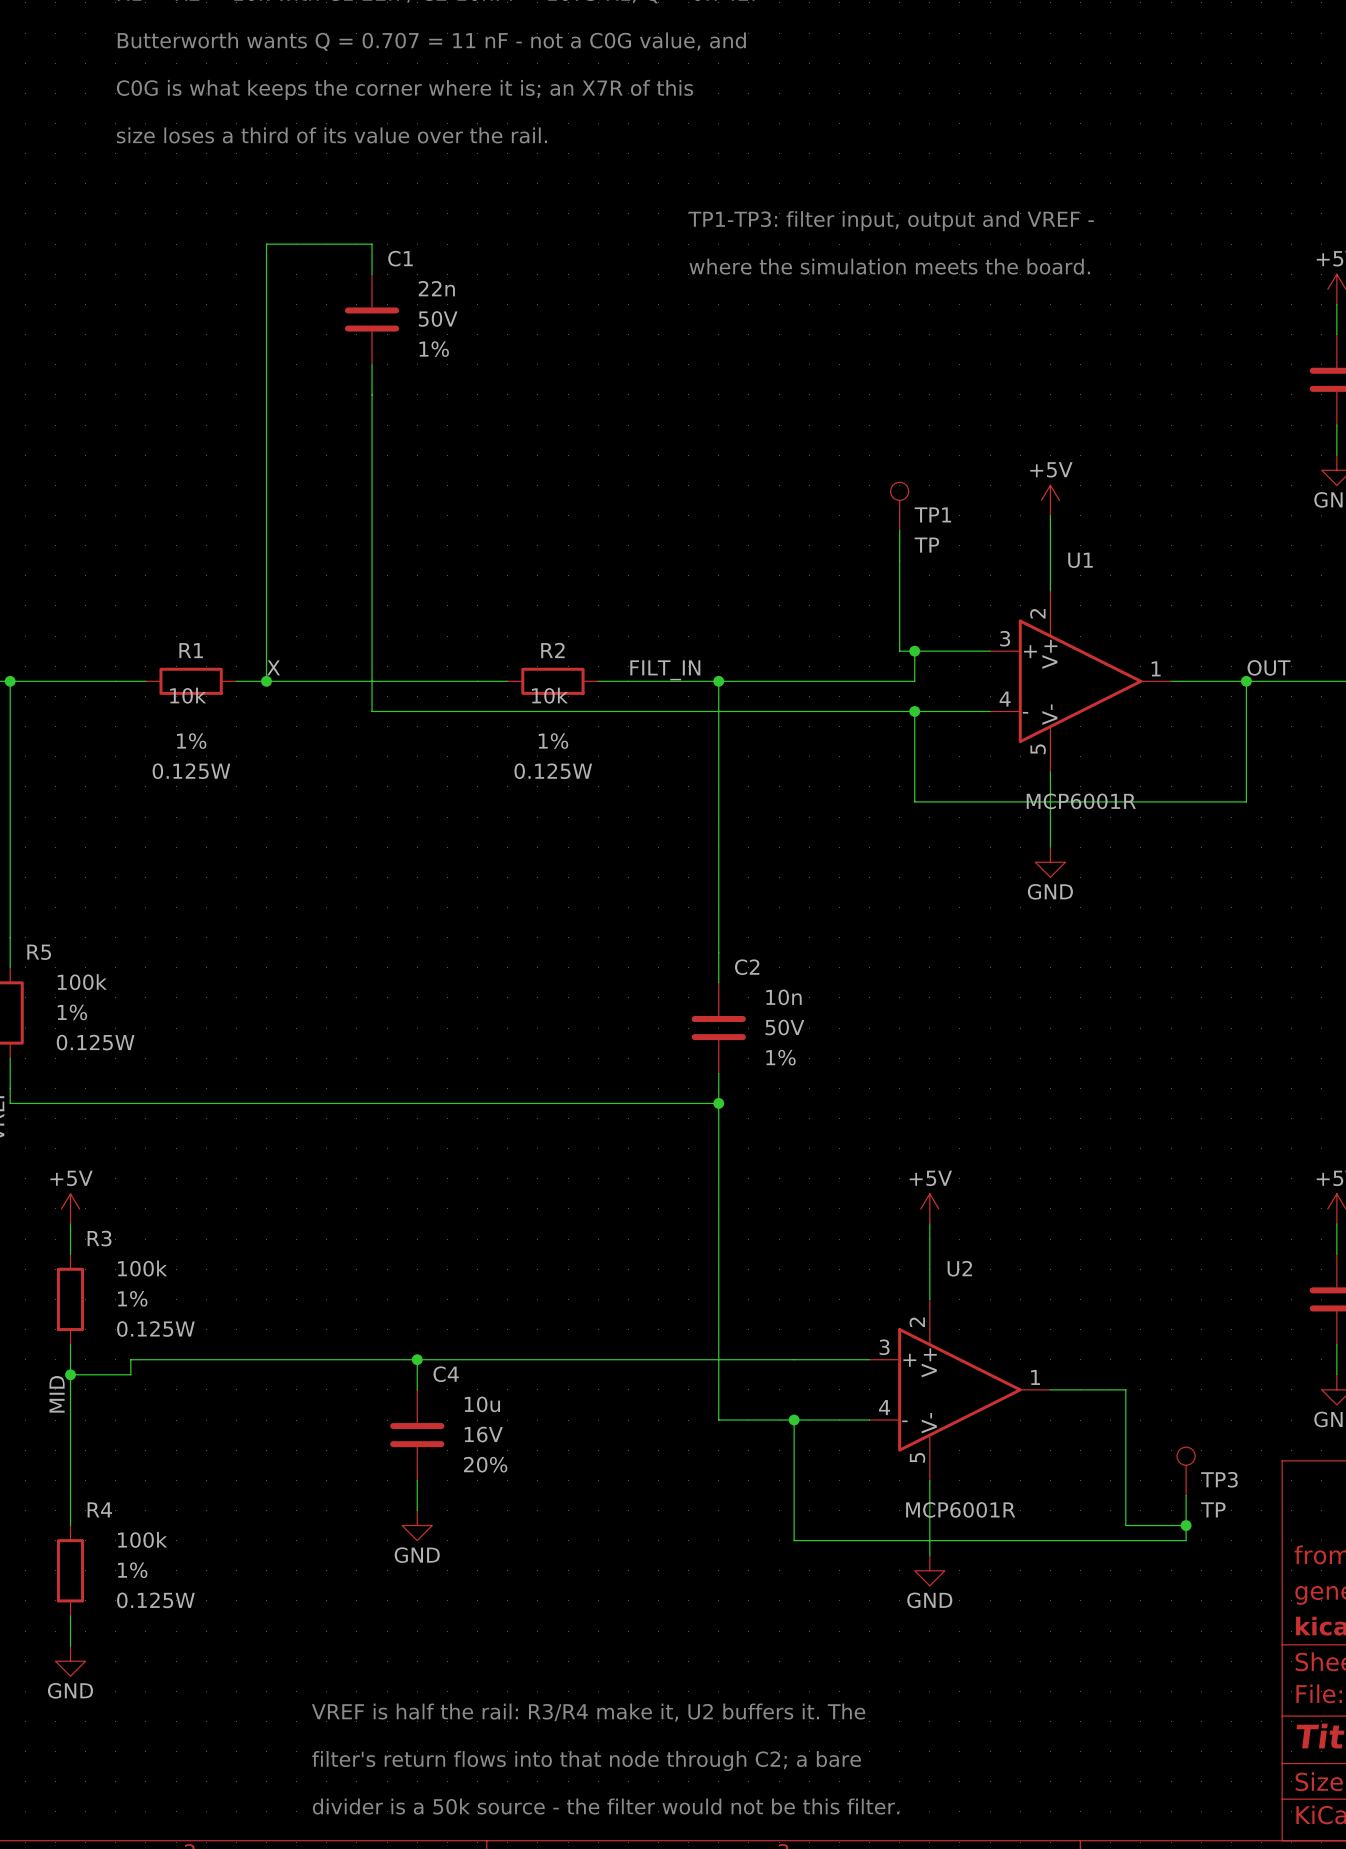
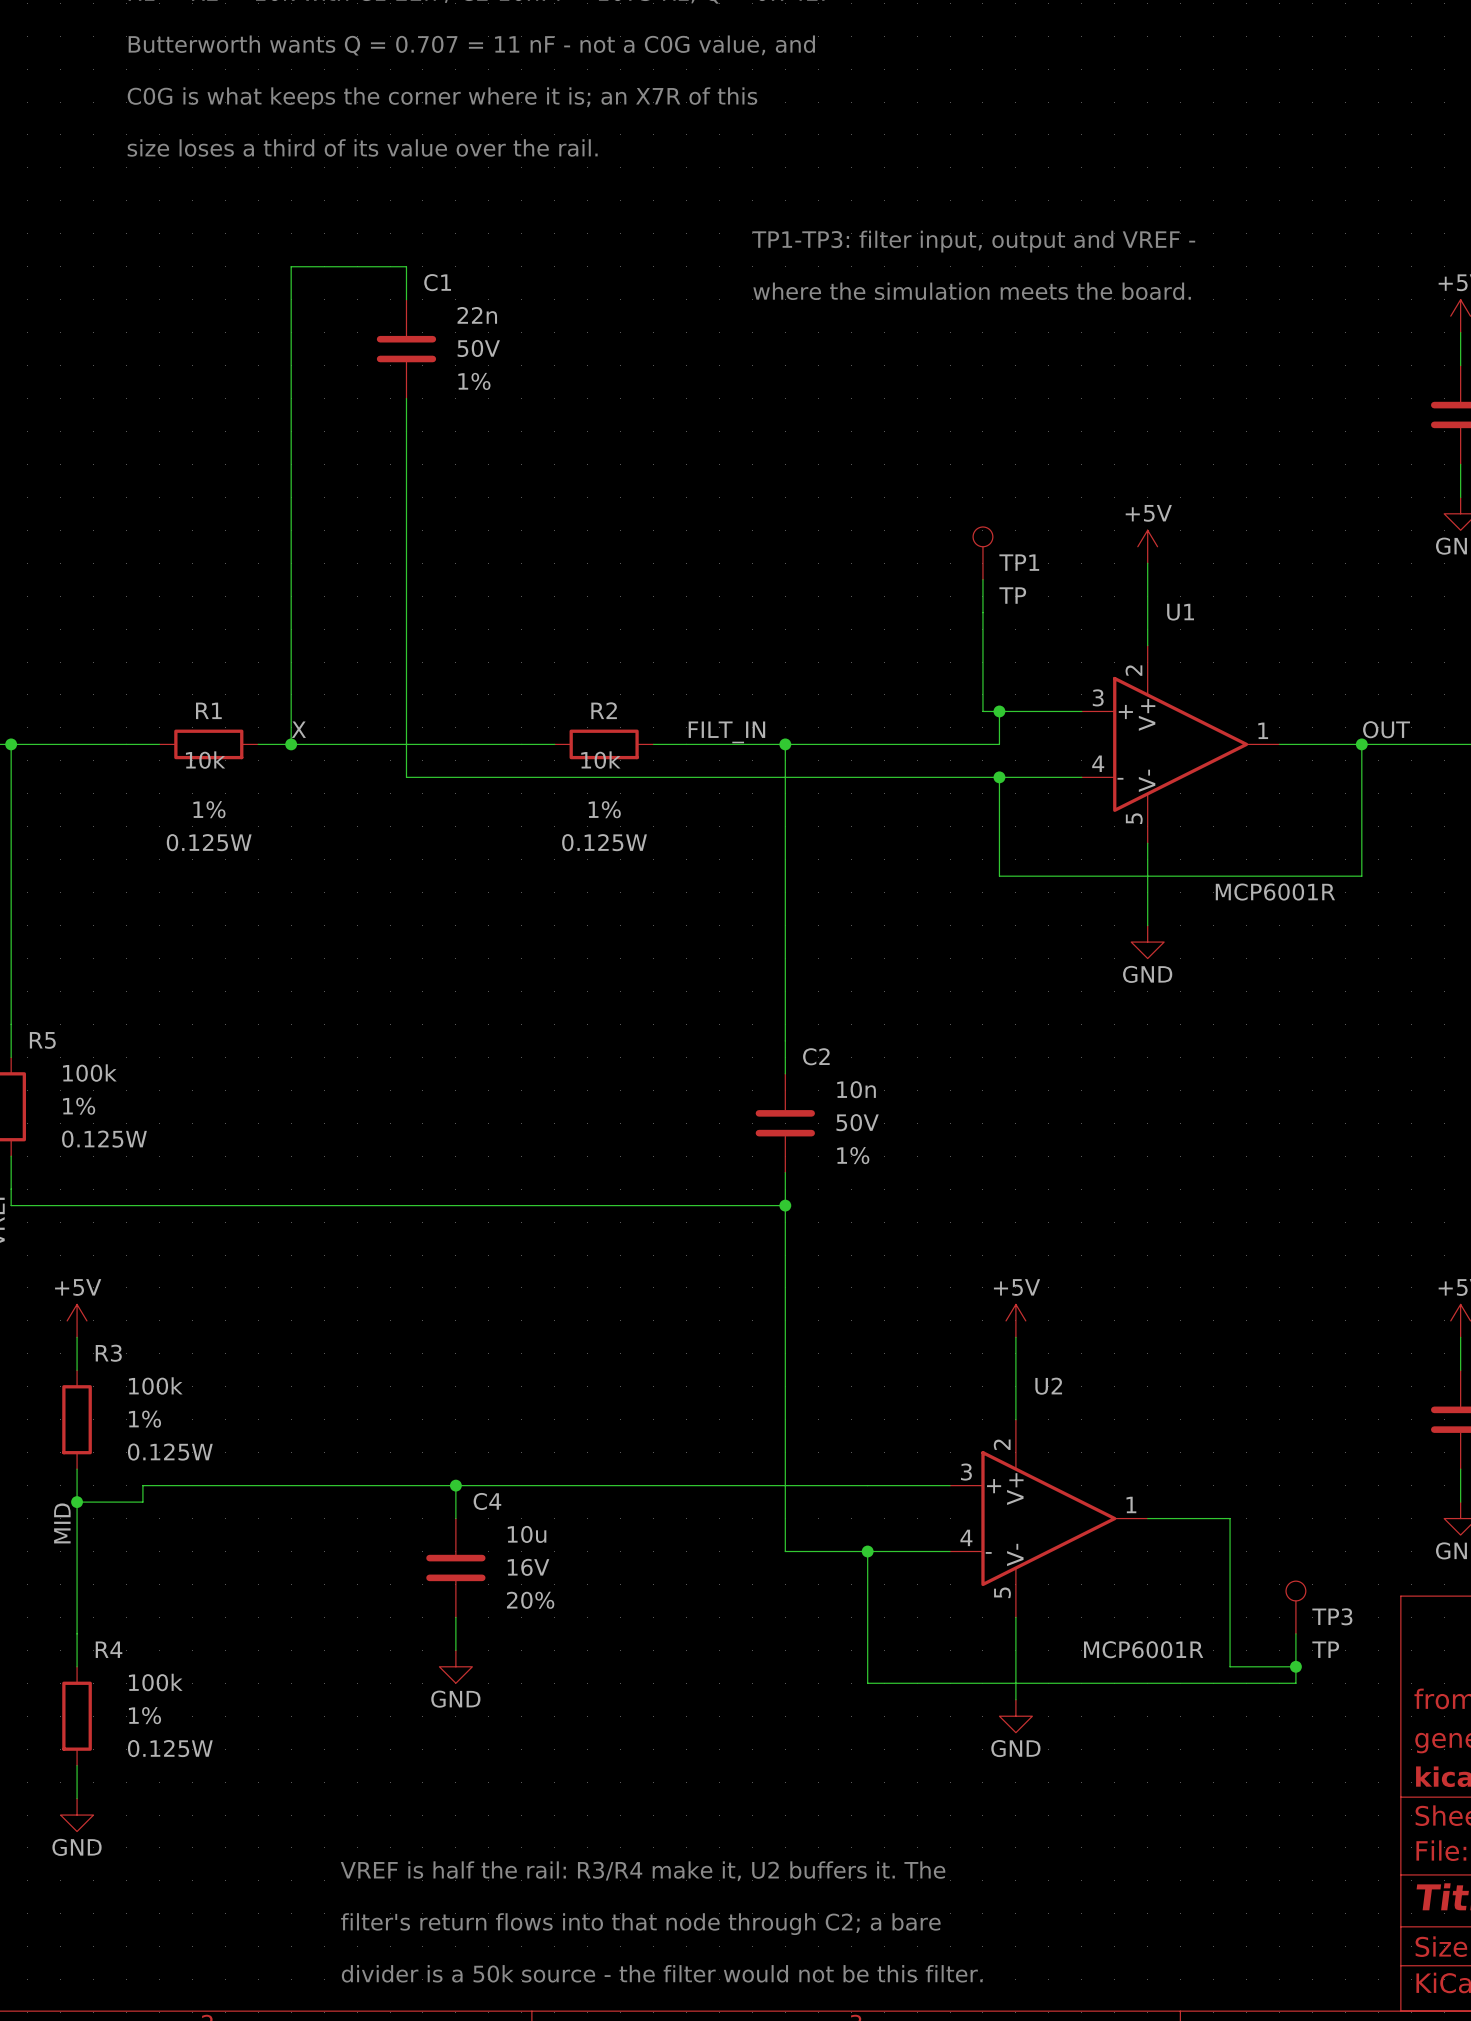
U1 value position: MCP6001R (1081, 801) -> MCP6001R (1275, 892)
U2 value position: MCP6001R (960, 1509) -> MCP6001R (1143, 1649)

